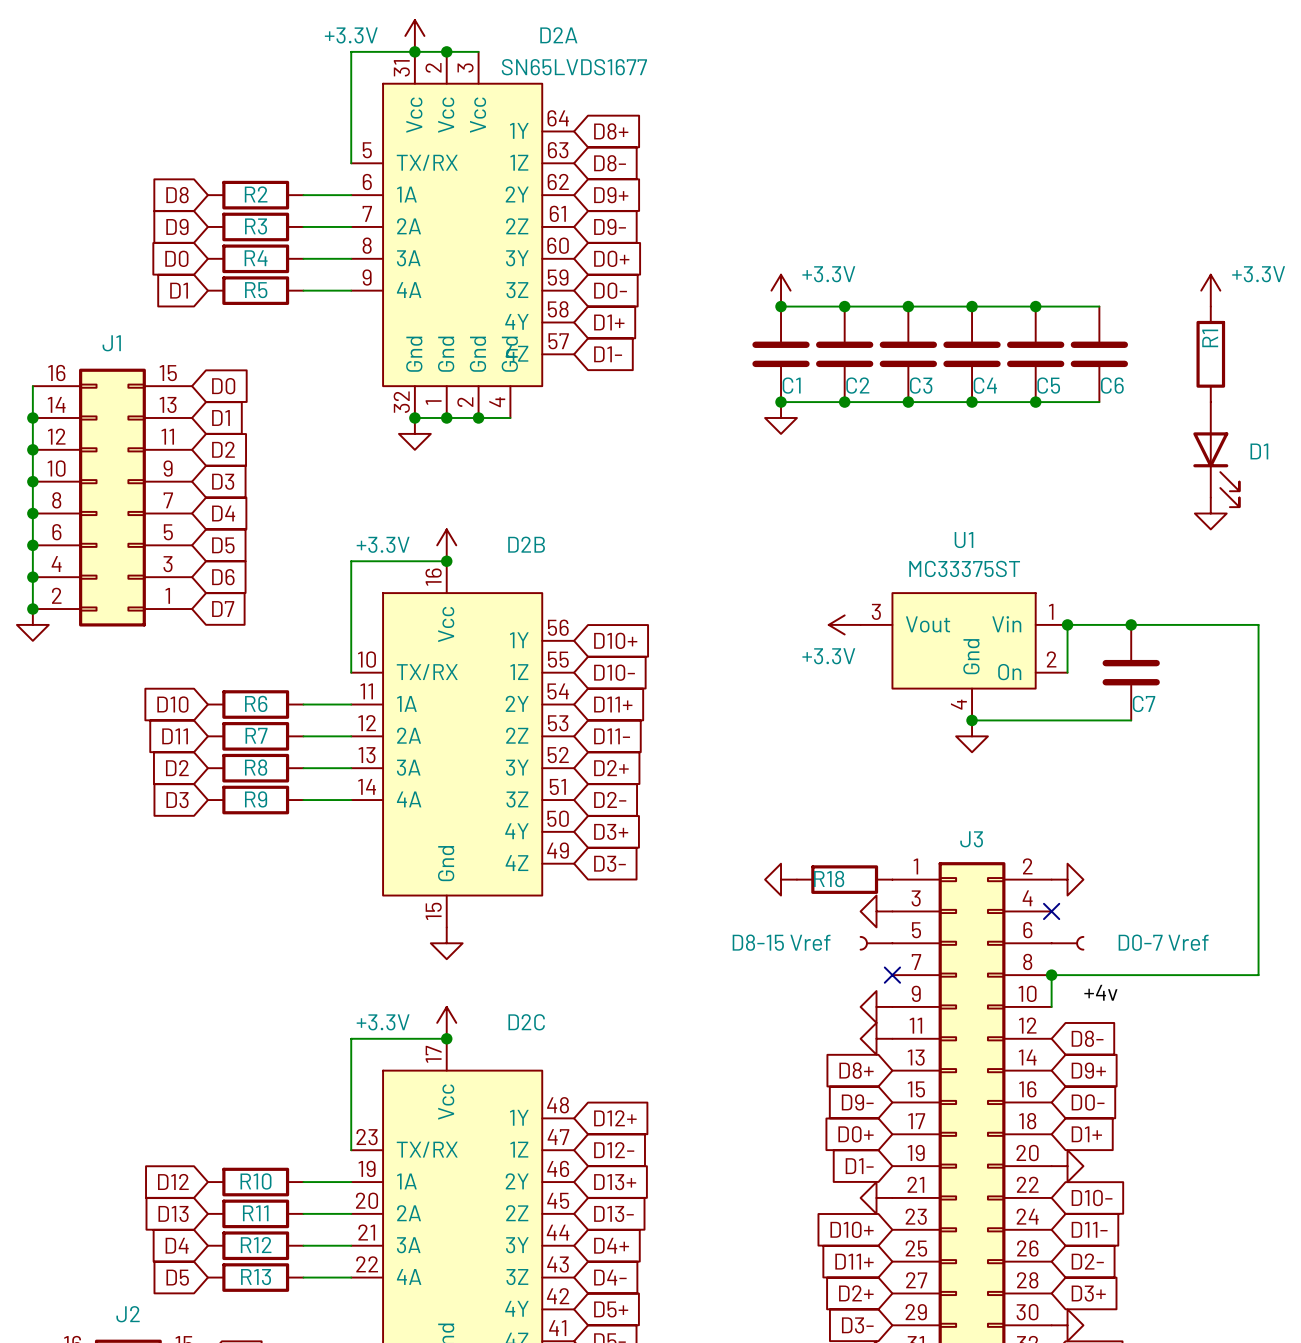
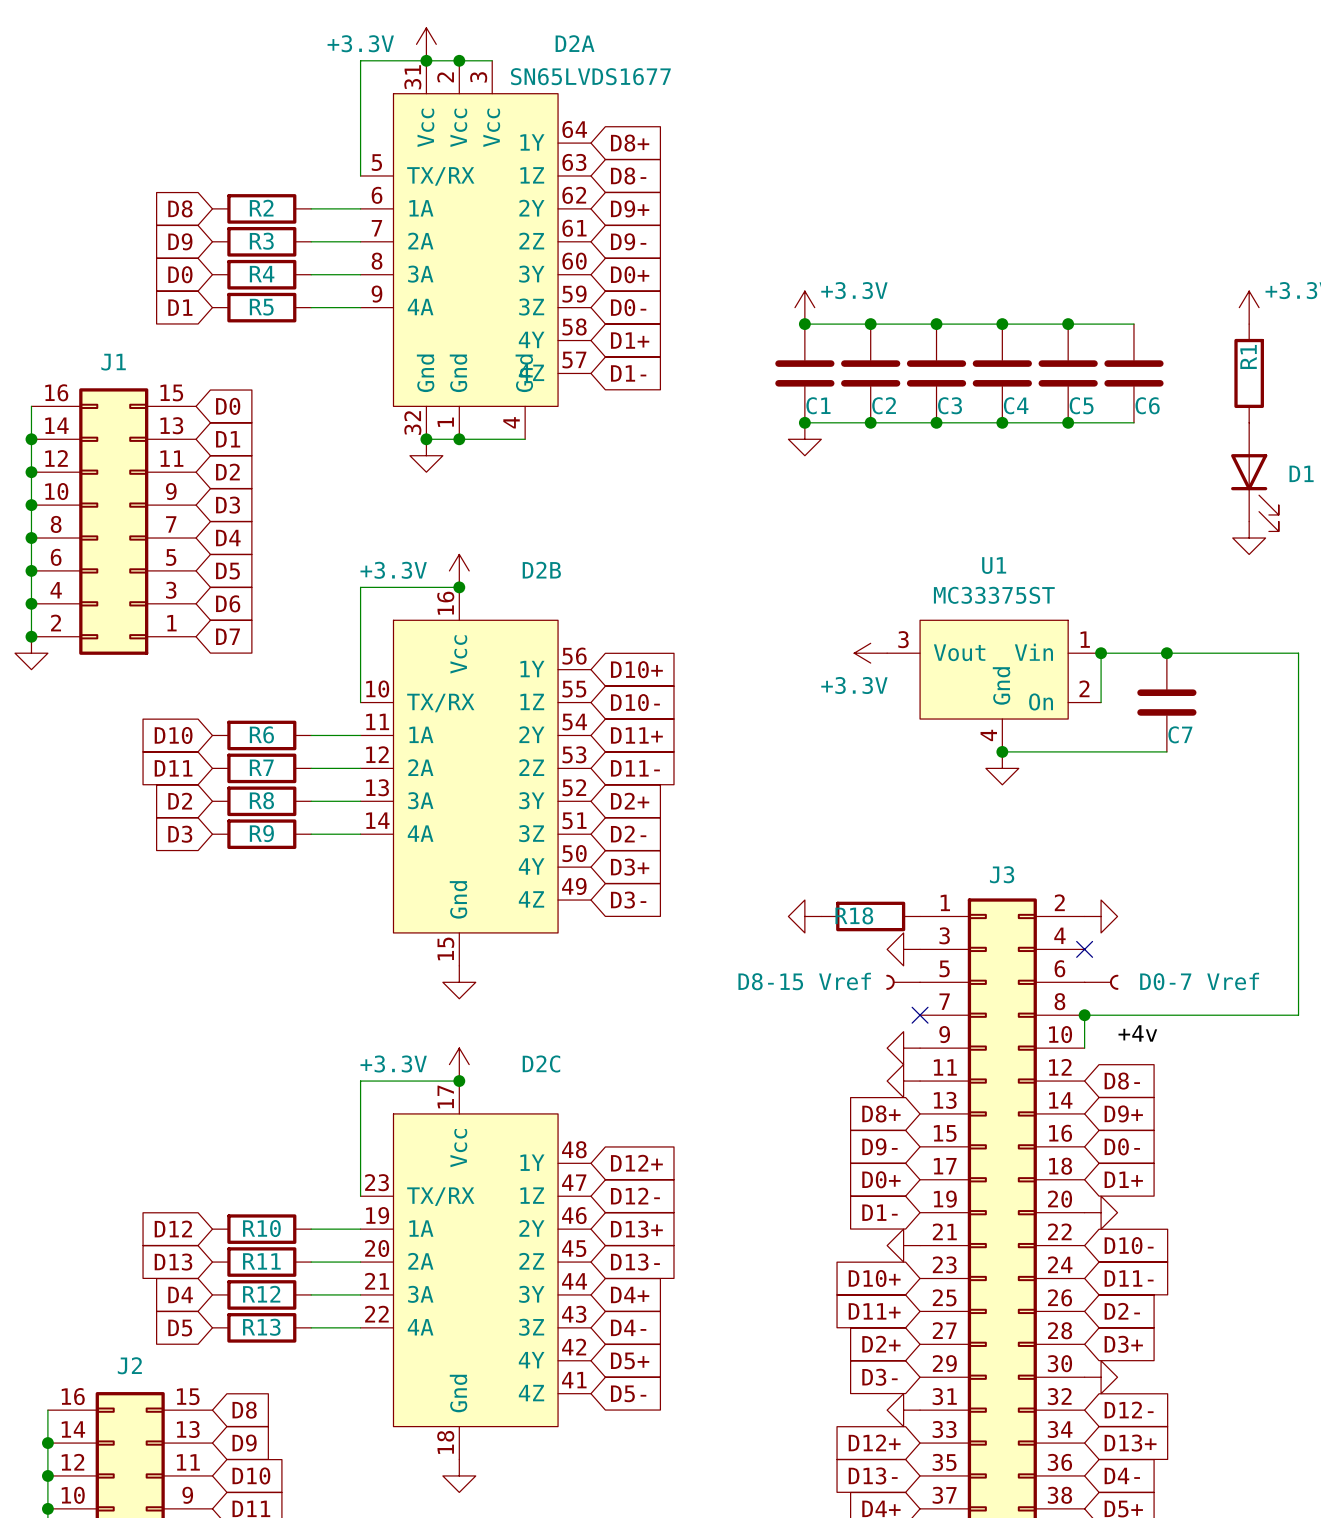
D2A symbol: [351, 51, 575, 418] -> [360, 60, 591, 440]
junction: (478, 417) -> none

